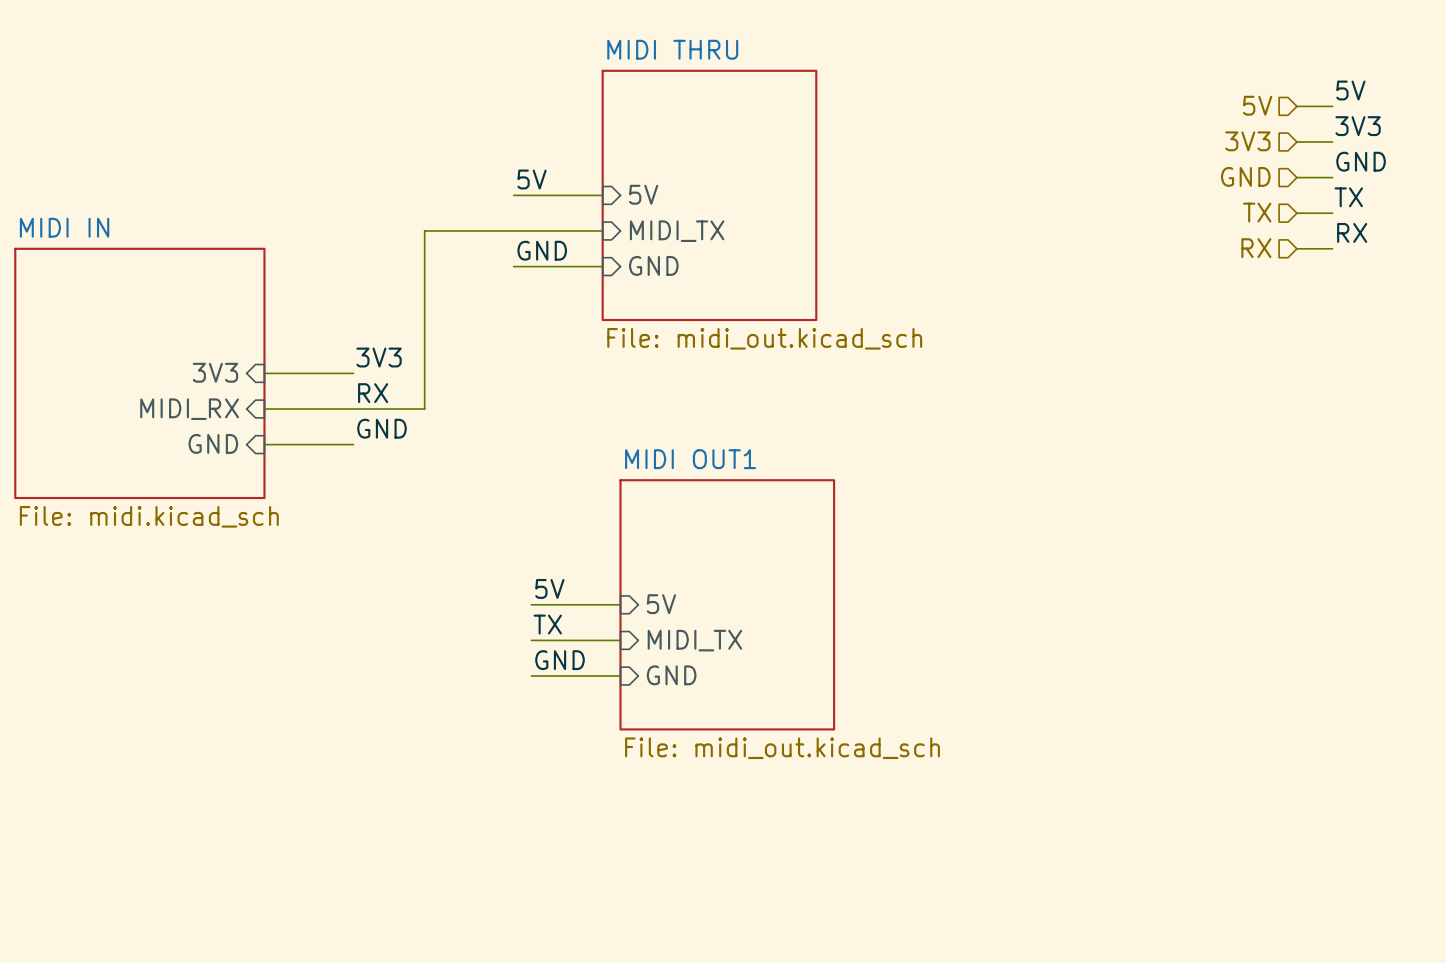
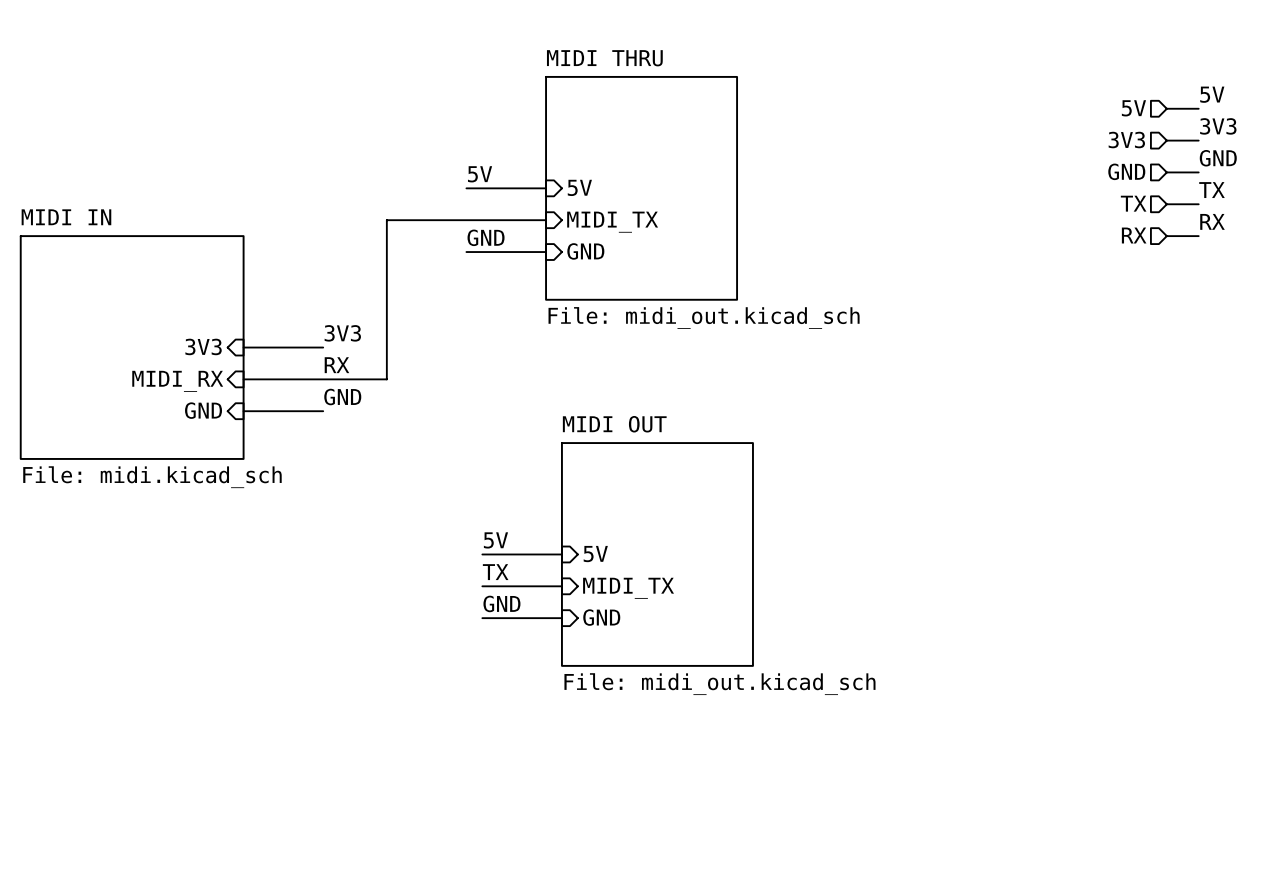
sheet MIDI OUT1 name: MIDI OUT1 (690, 459) -> MIDI OUT (614, 424)

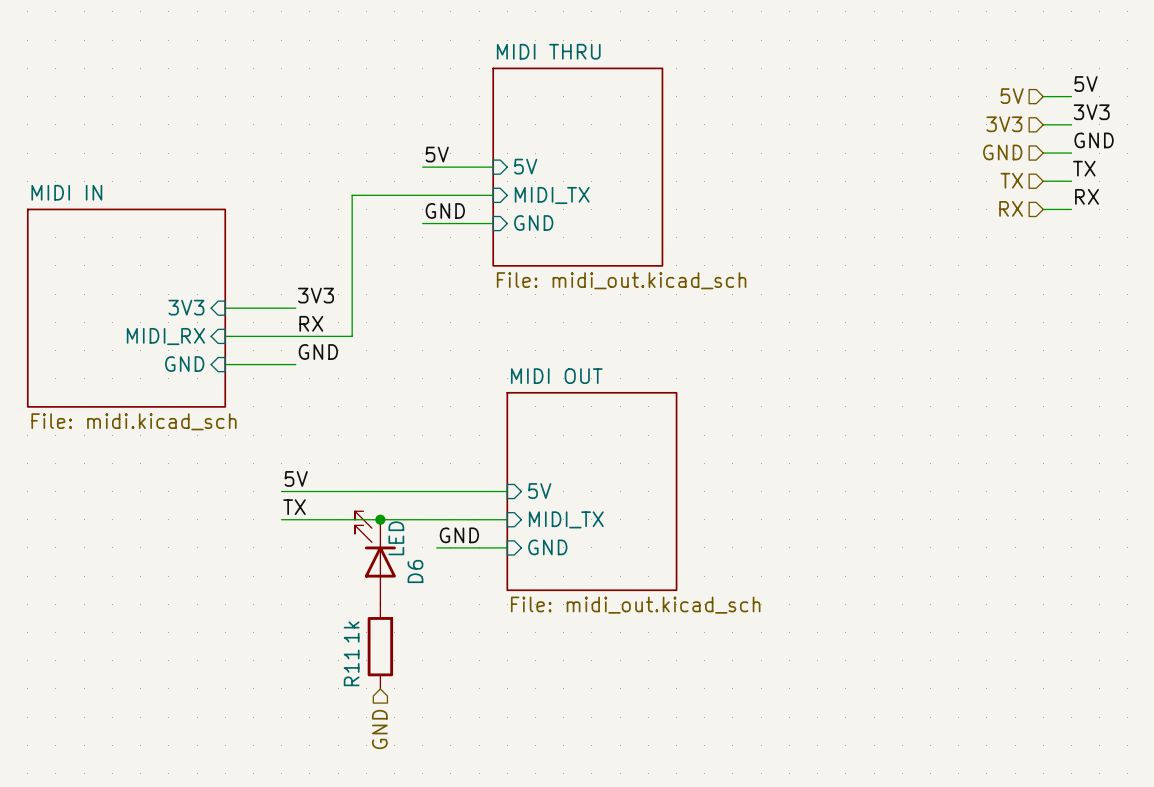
label position: 5V (495, 540) -> 5V (296, 478)
wire: none -> (281, 491) (436, 491)
label position: TX (495, 572) -> TX (294, 507)
wire: none -> (281, 519) (436, 519)
junction: none -> (380, 519)
D6: none -> LED (375, 557)
R11: none -> 1k (380, 646)
hierarchical label: none -> GND (379, 729)

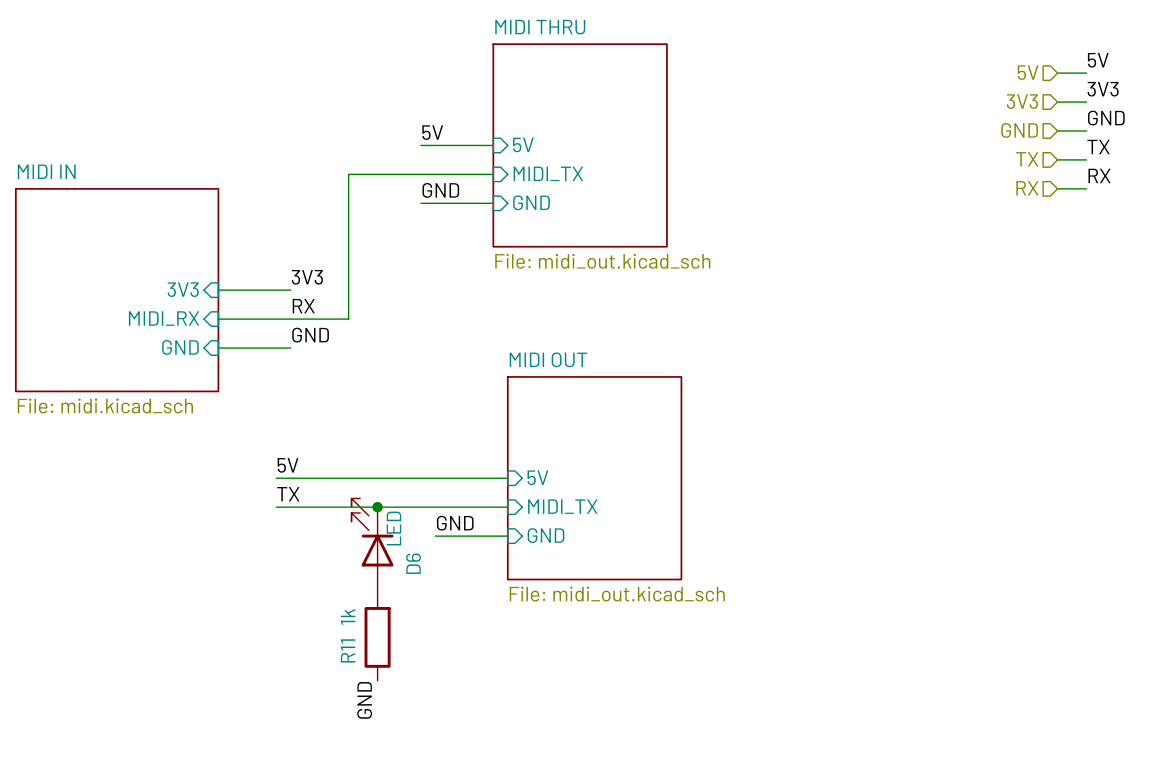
label: none -> GND (364, 700)
hierarchical label: GND (379, 729) -> none

